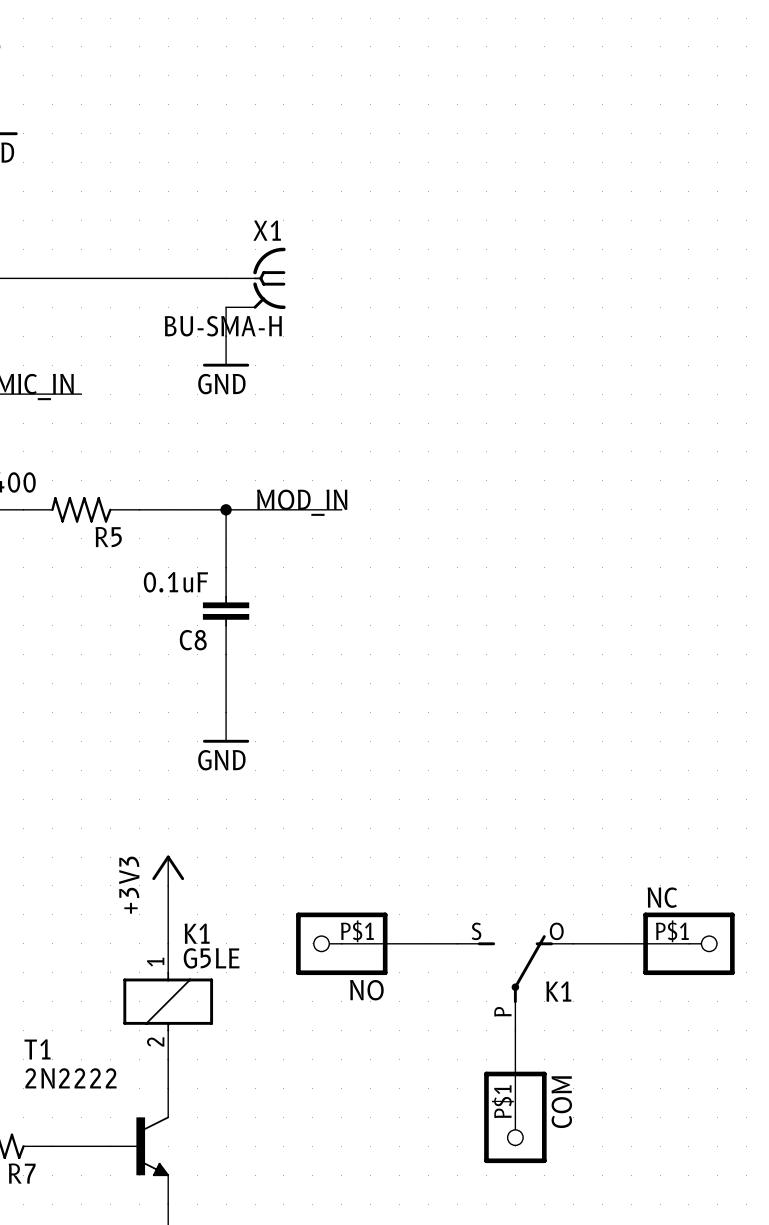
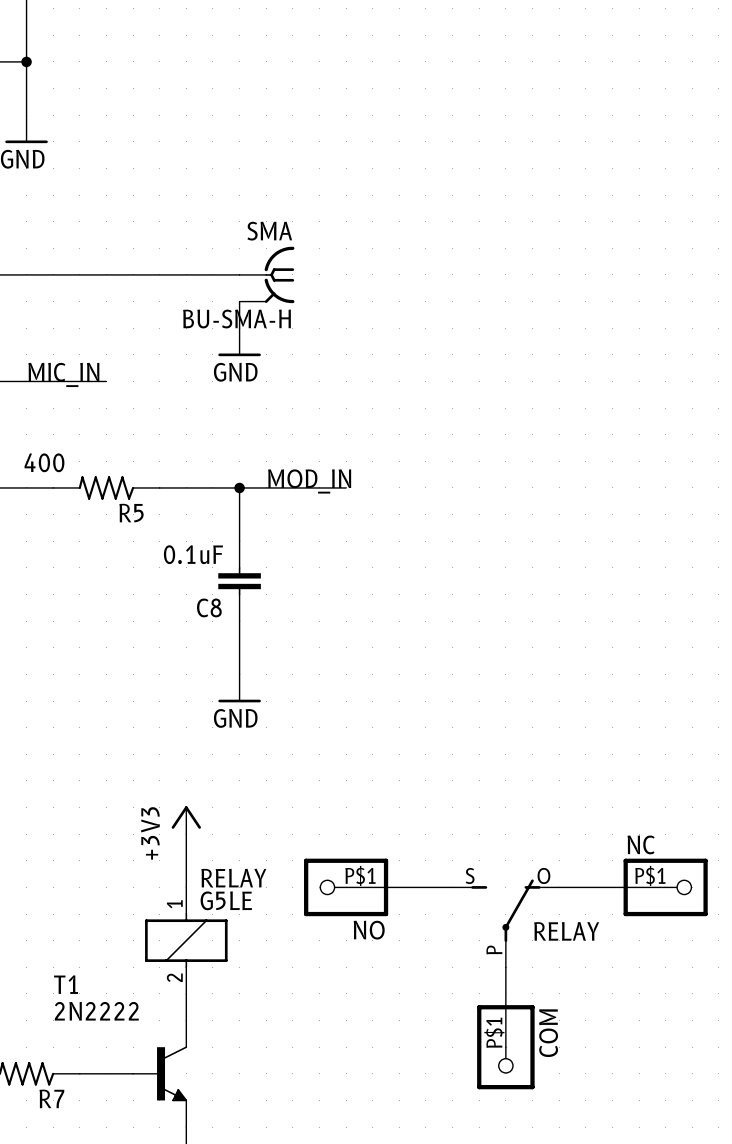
X1 name: X1 (267, 230) -> SMA (269, 231)
K1 name: K1 (197, 933) -> RELAY (233, 878)
K1 name: K1 (558, 991) -> RELAY (566, 931)

